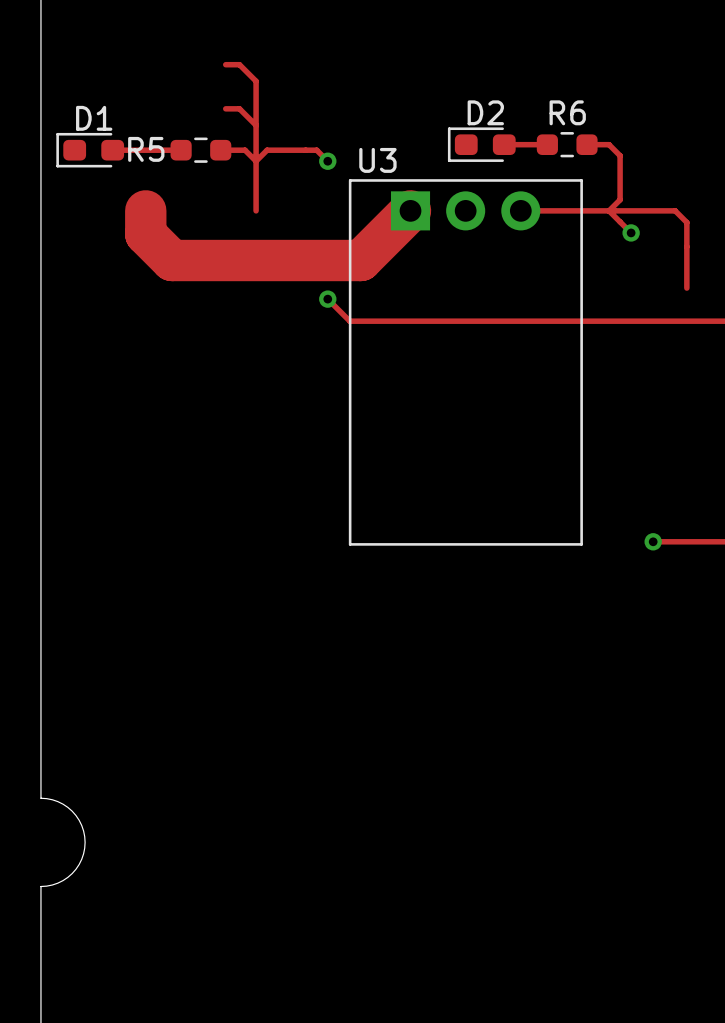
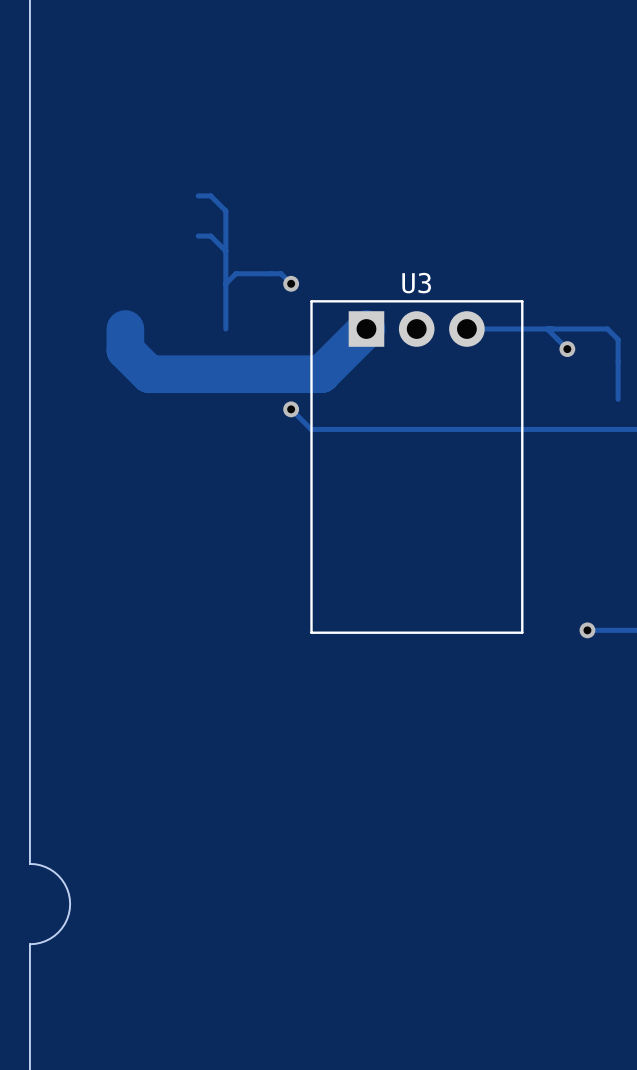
D2: (481, 144) -> none
track: (504, 144) (547, 144) -> none
R6: (567, 144) -> none
track: (587, 144) (609, 144) (620, 155) (620, 199) (609, 210) -> none
D1: (90, 150) -> none
track: (112, 150) (181, 150) -> none
R5: (200, 150) -> none
track: (222, 150) (245, 150) (256, 161) -> none
U3 name position: U3 (377, 160) -> U3 (416, 283)

